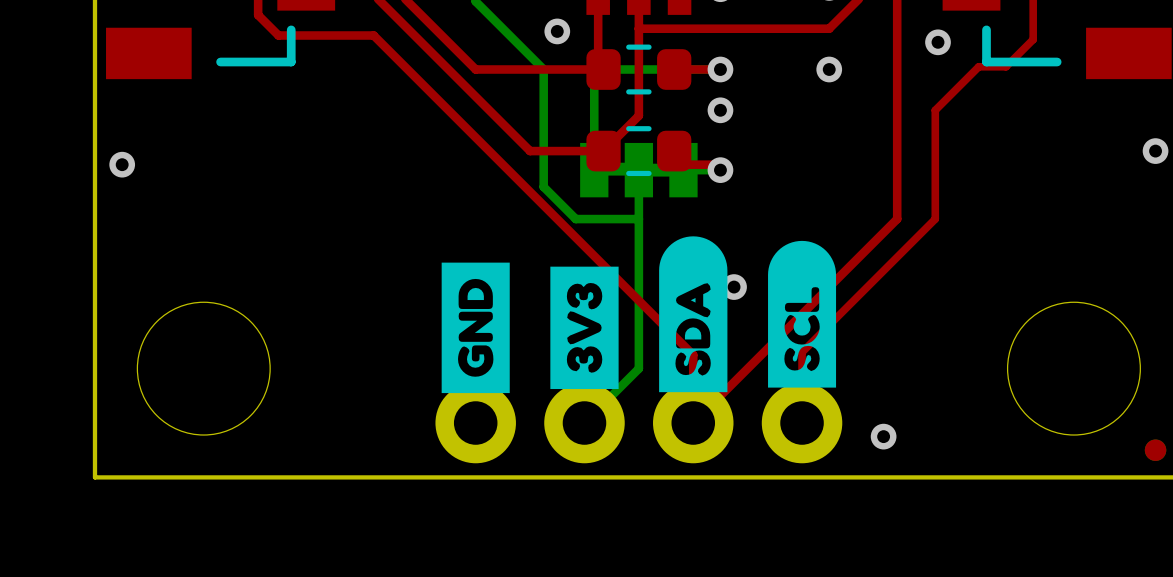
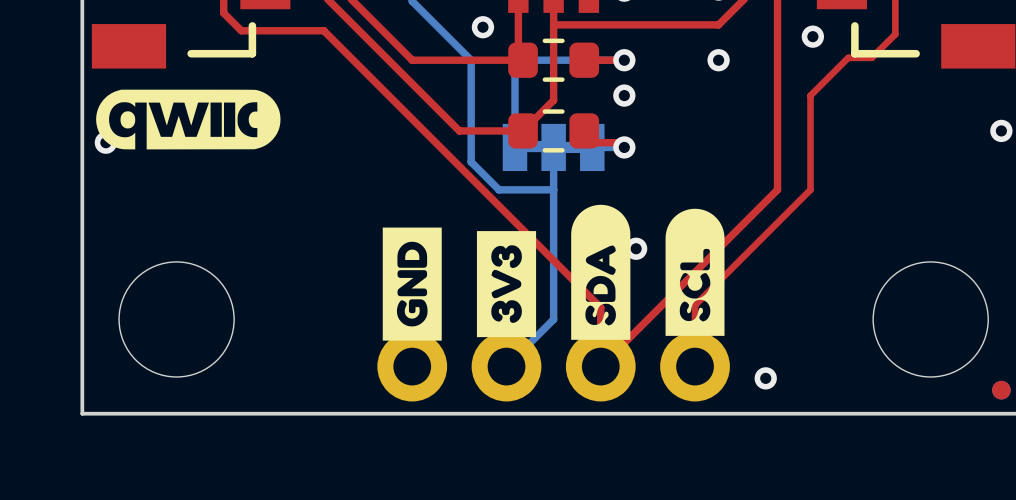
drawing: none -> [96, 89, 281, 150]

